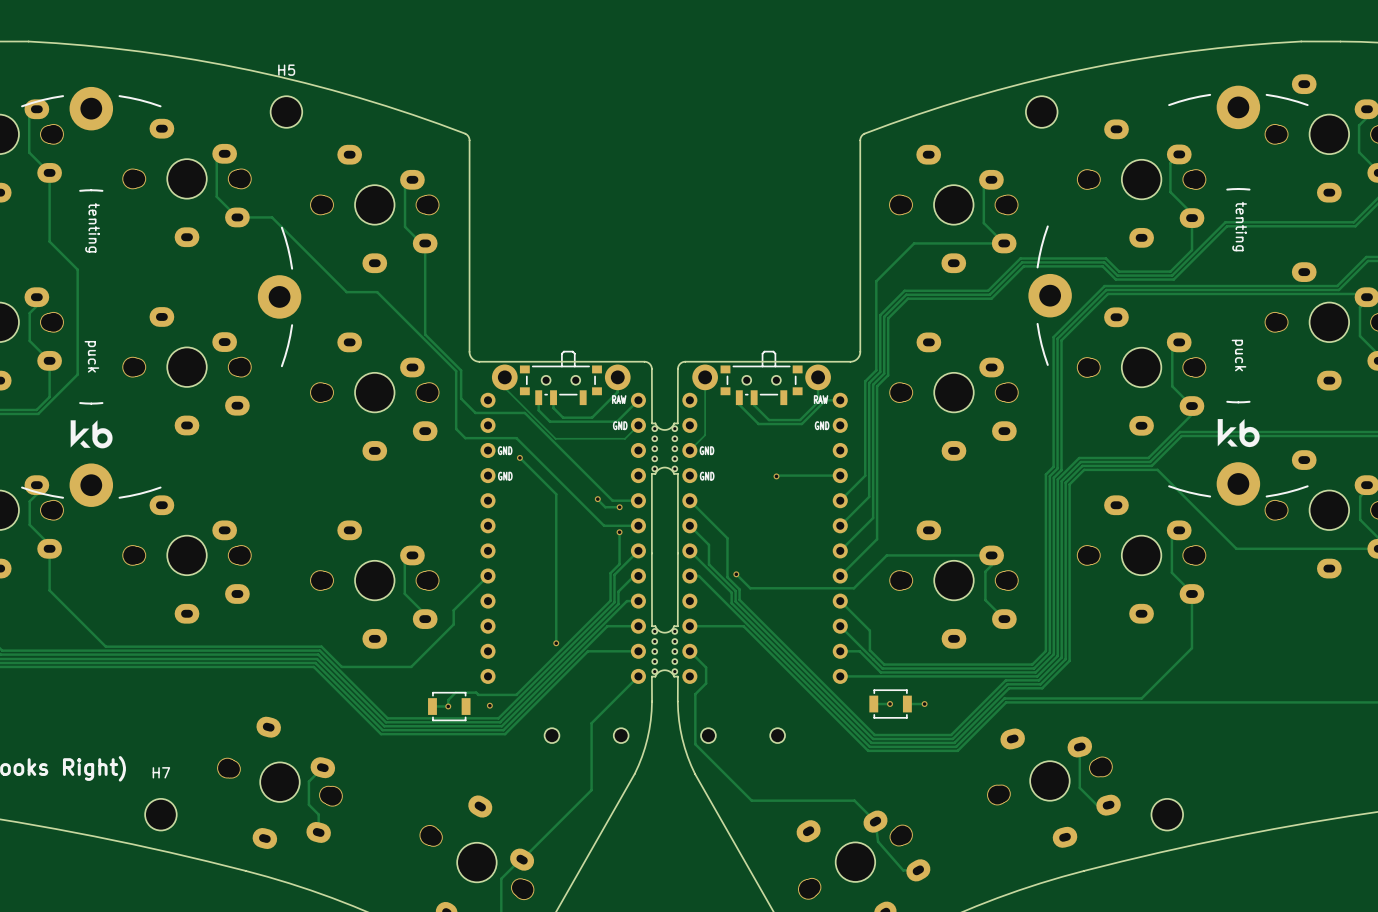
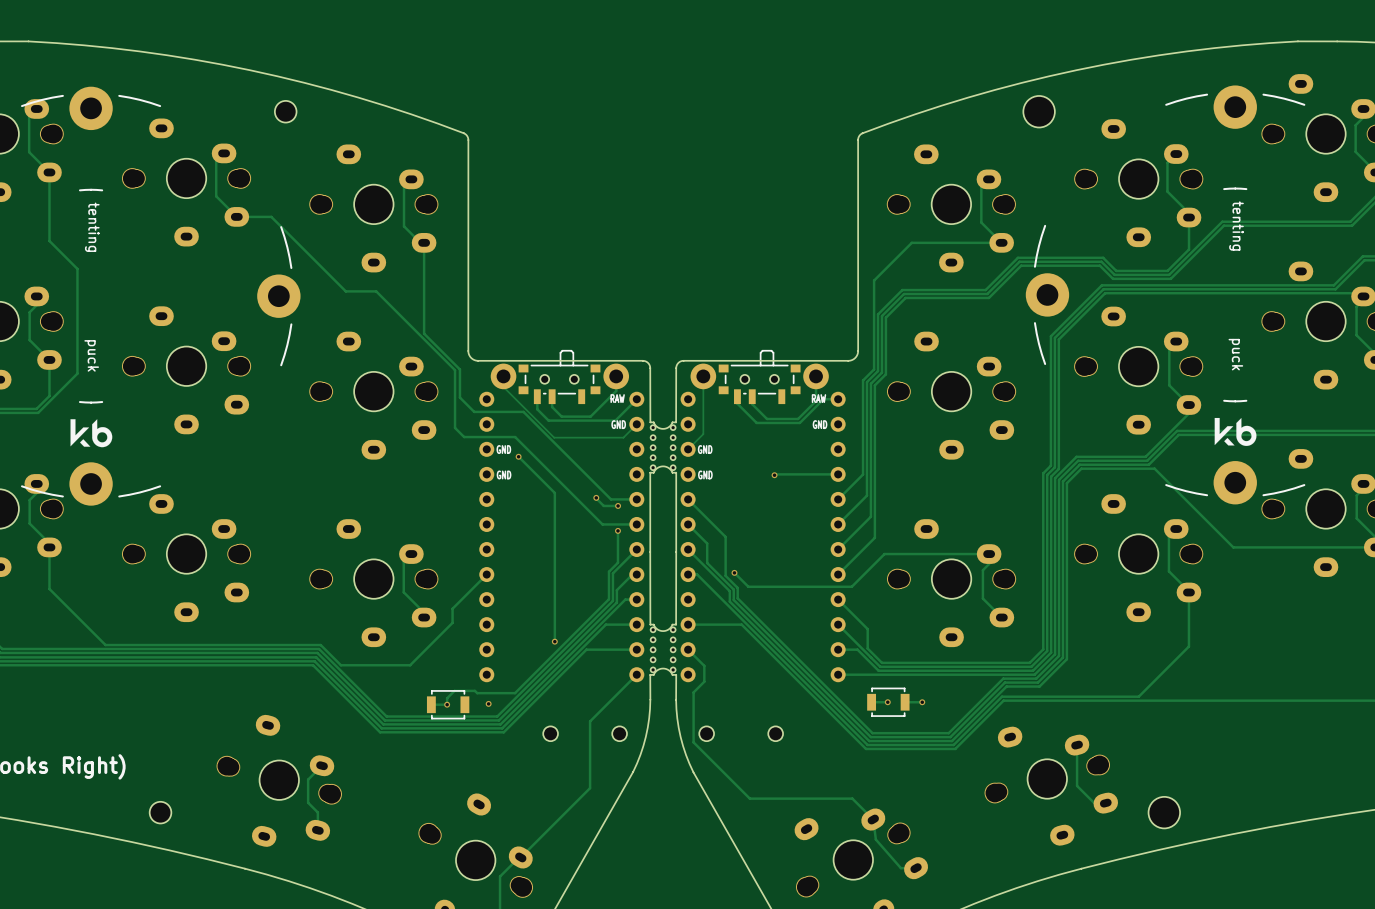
H5: (286, 112) -> none
part: none -> (285, 111)
H7: (160, 814) -> none
part: none -> (160, 812)

